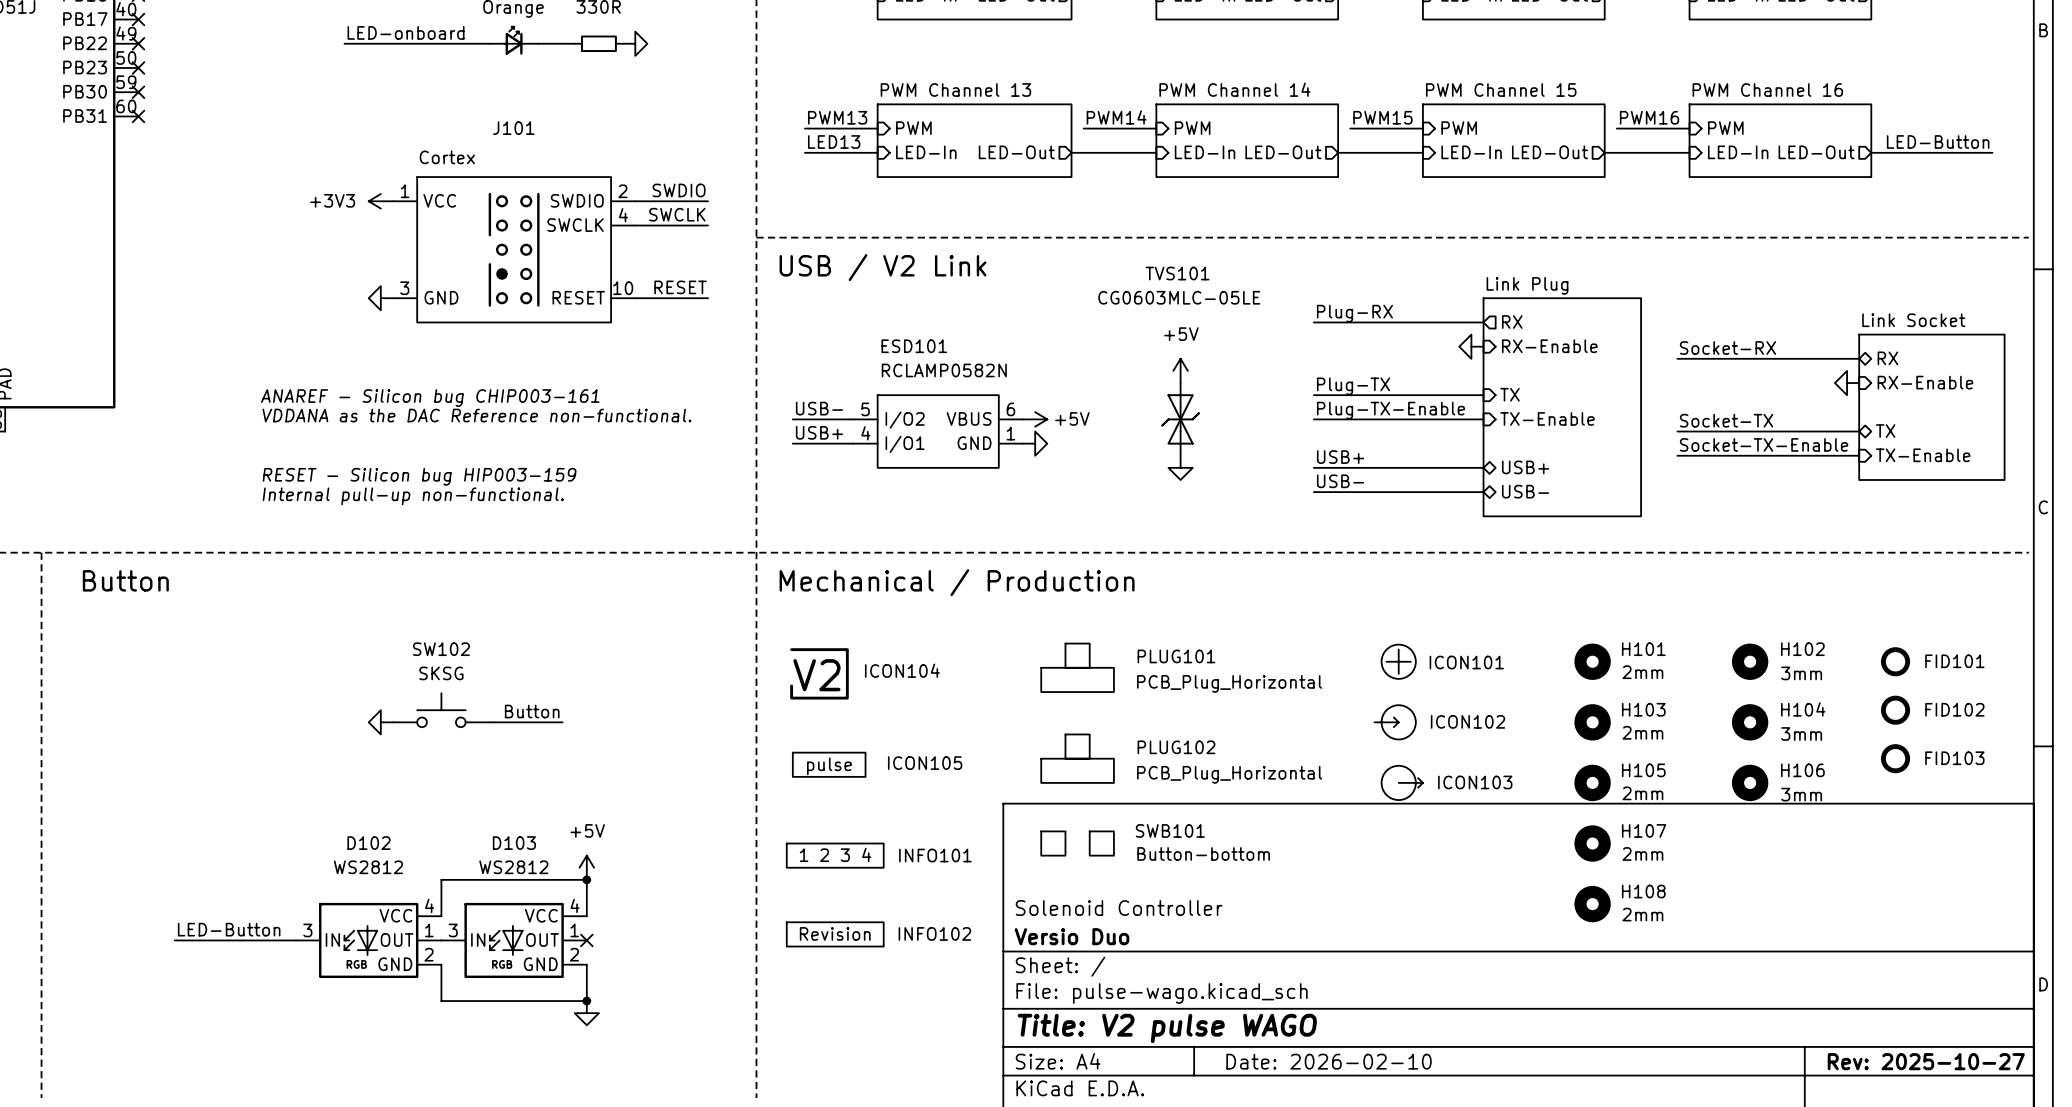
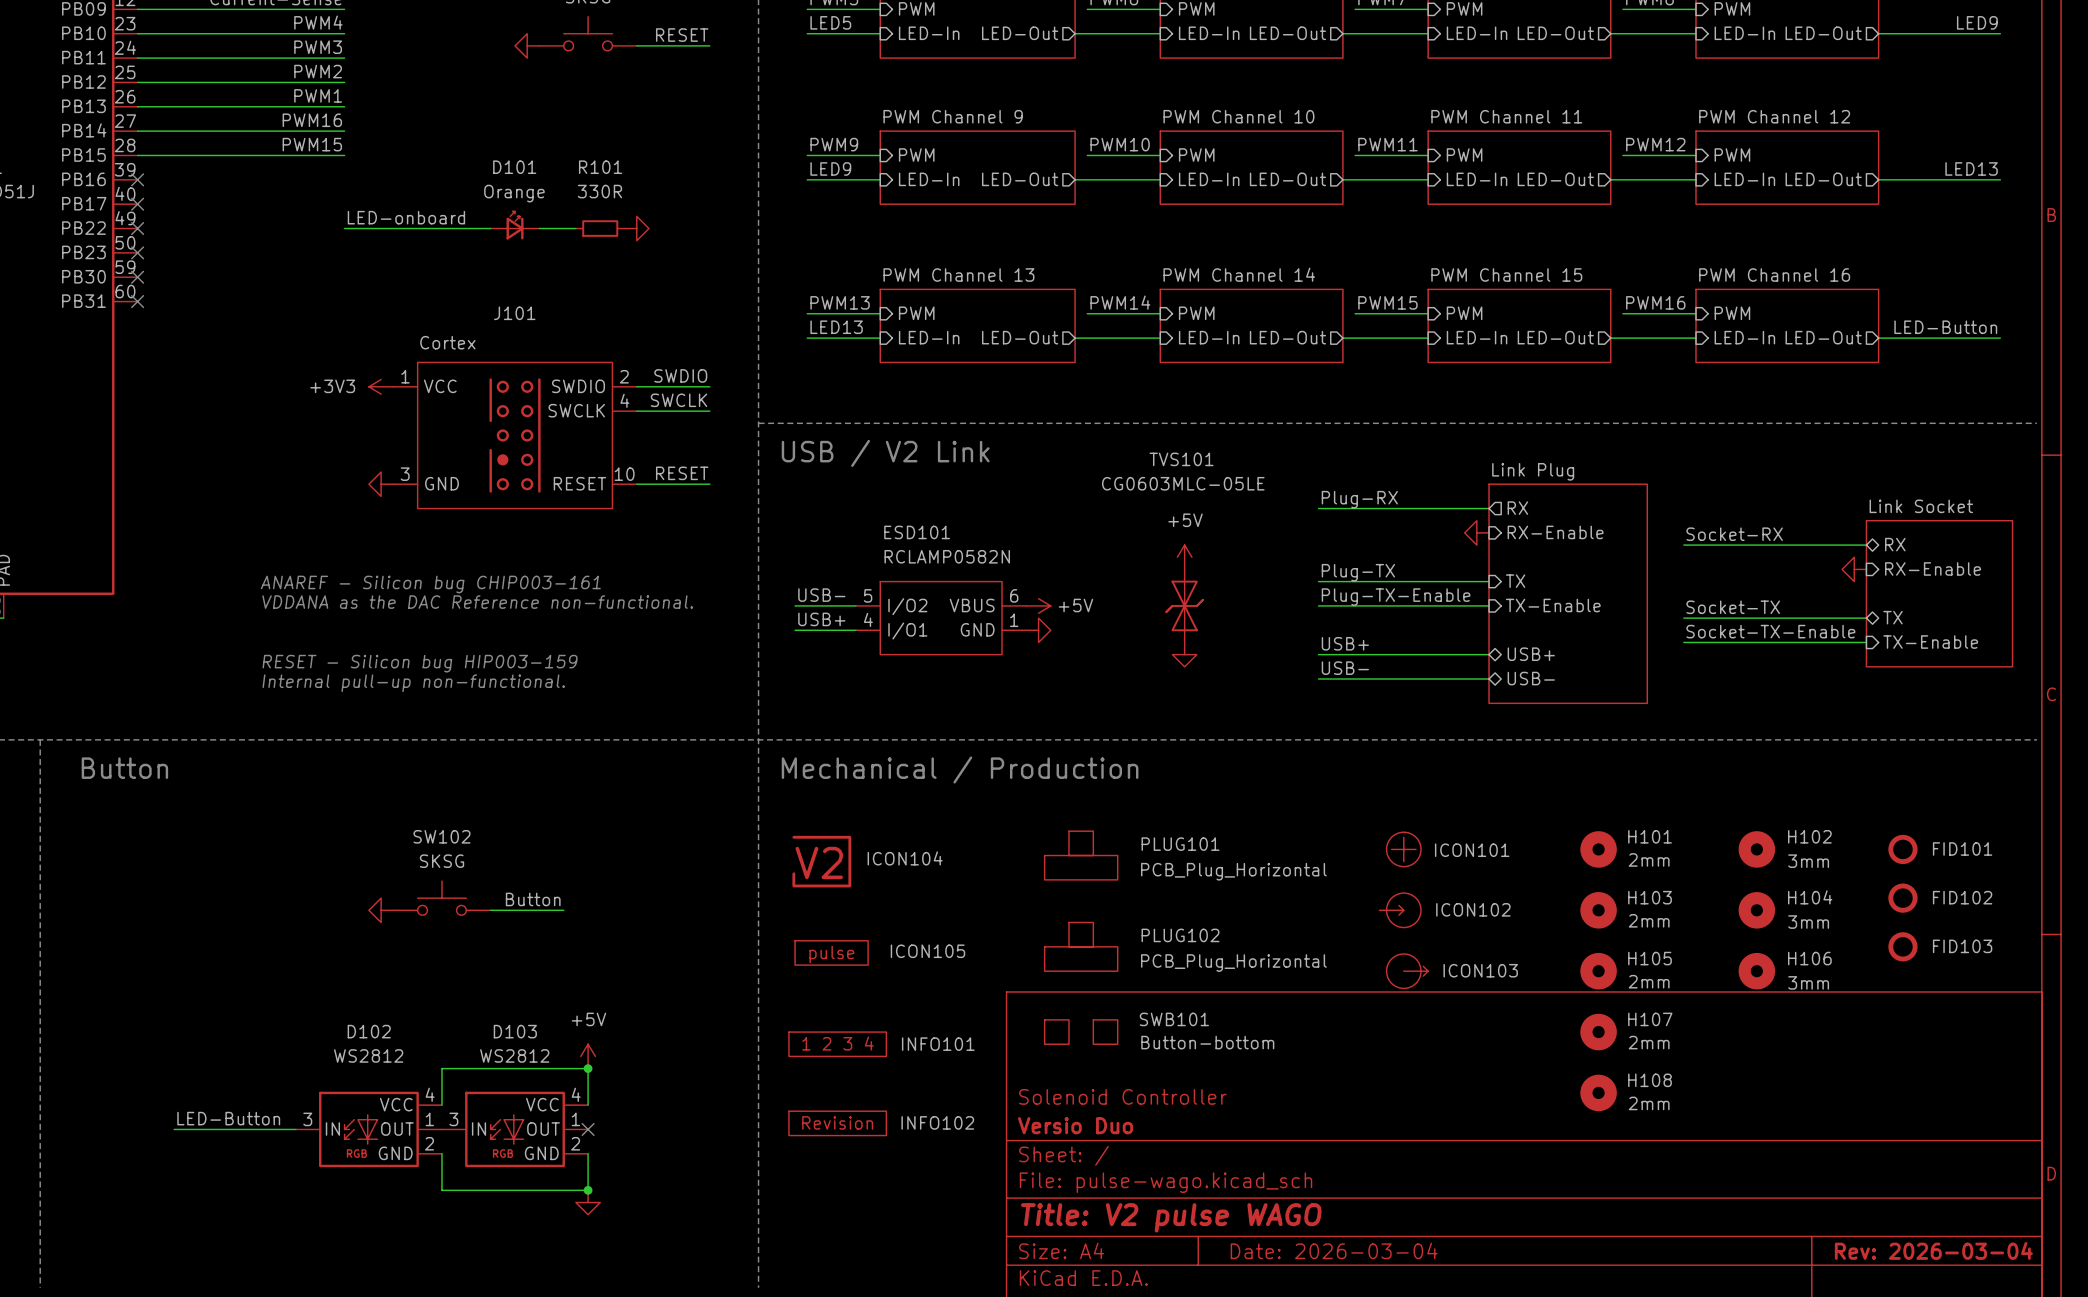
title block: Date: 2026-02-10 (1329, 1061) -> Date: 2026-03-04 (1334, 1250)
title block: Rev: 2025-10-27 (1926, 1061) -> Rev: 2026-03-04 (1933, 1250)

